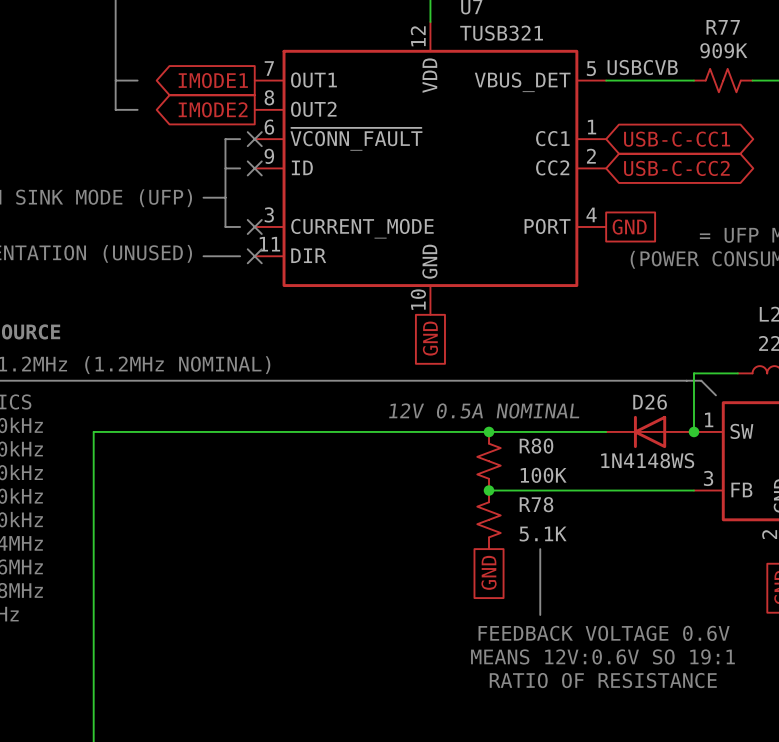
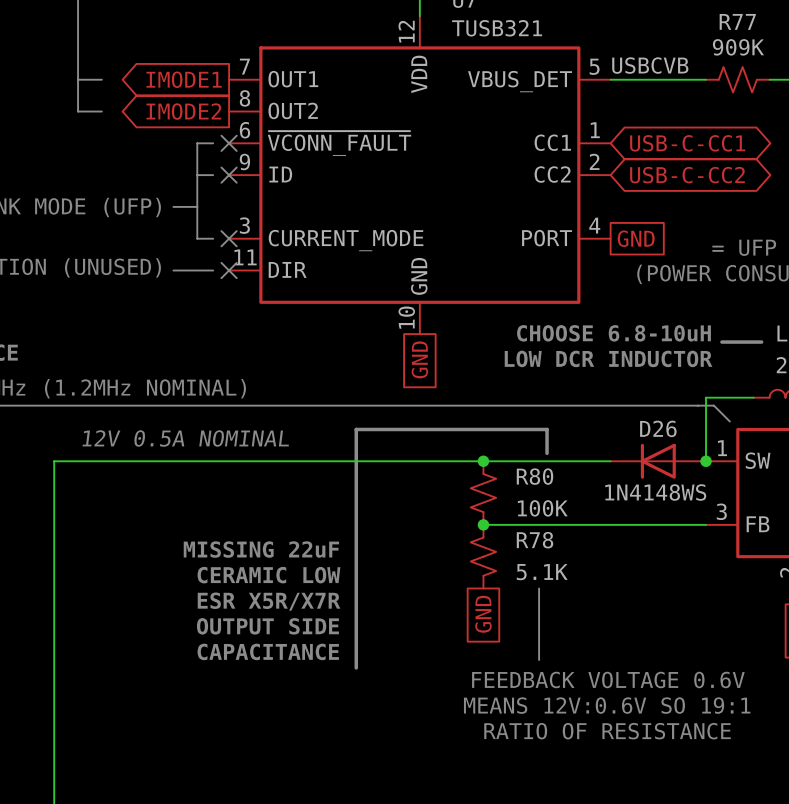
text: none -> CHOOSE 6.8-10uH (613, 333)
line: none -> (721, 342) (761, 342)
text: none -> LOW DCR INDUCTOR (608, 358)
text position: 12V 0.5A NOMINAL (484, 410) -> 12V 0.5A NOMINAL (185, 438)
line: none -> (547, 453) (547, 429) (356, 429) (356, 667)
text: none -> MISSING 22uF (261, 549)
text: none -> CERAMIC LOW (268, 575)
text: none -> ESR X5R/X7R (269, 601)
text: none -> OUTPUT SIDE (267, 626)
text: none -> CAPACITANCE (268, 651)

